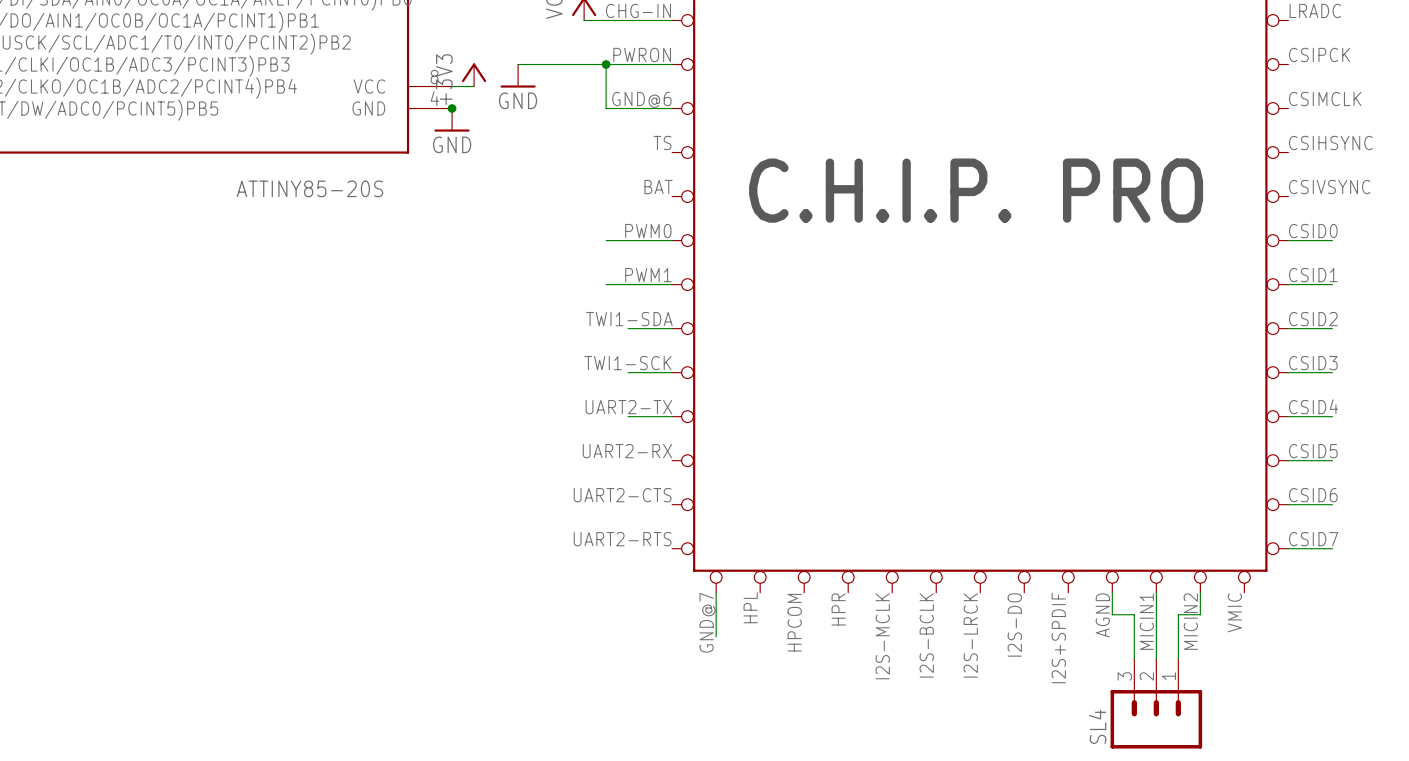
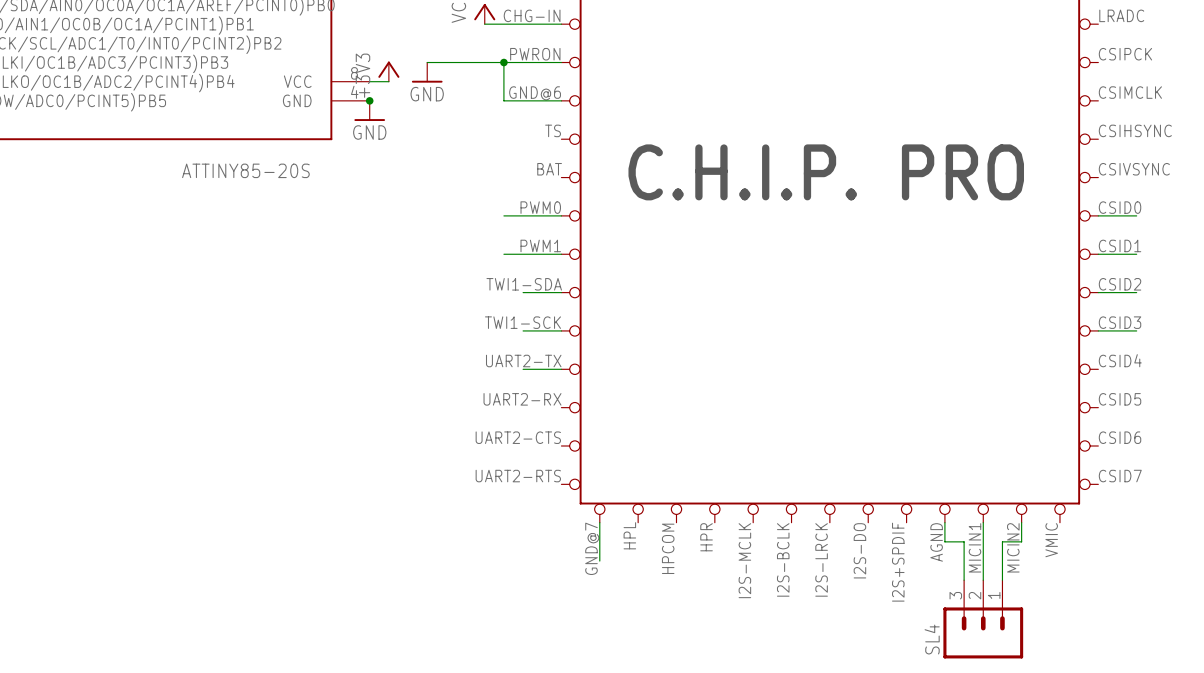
wire: (1288, 416) (1332, 416) -> none
wire: (1288, 460) (1332, 460) -> none
wire: (1288, 504) (1332, 504) -> none
wire: (1288, 548) (1332, 548) -> none

